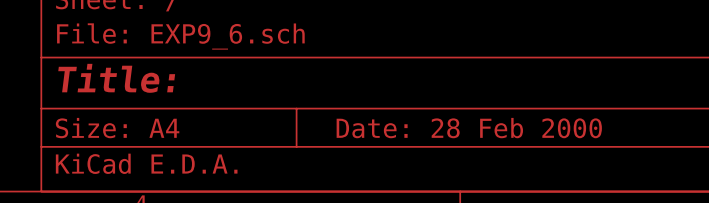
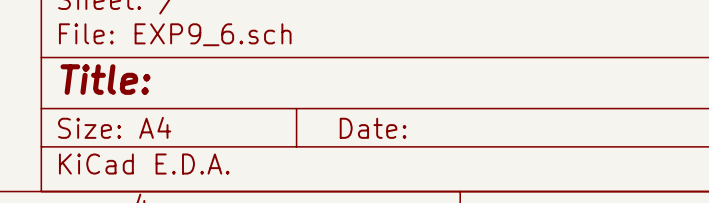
title block: Date: 28 Feb 2000 (469, 128) -> Date: (373, 128)

